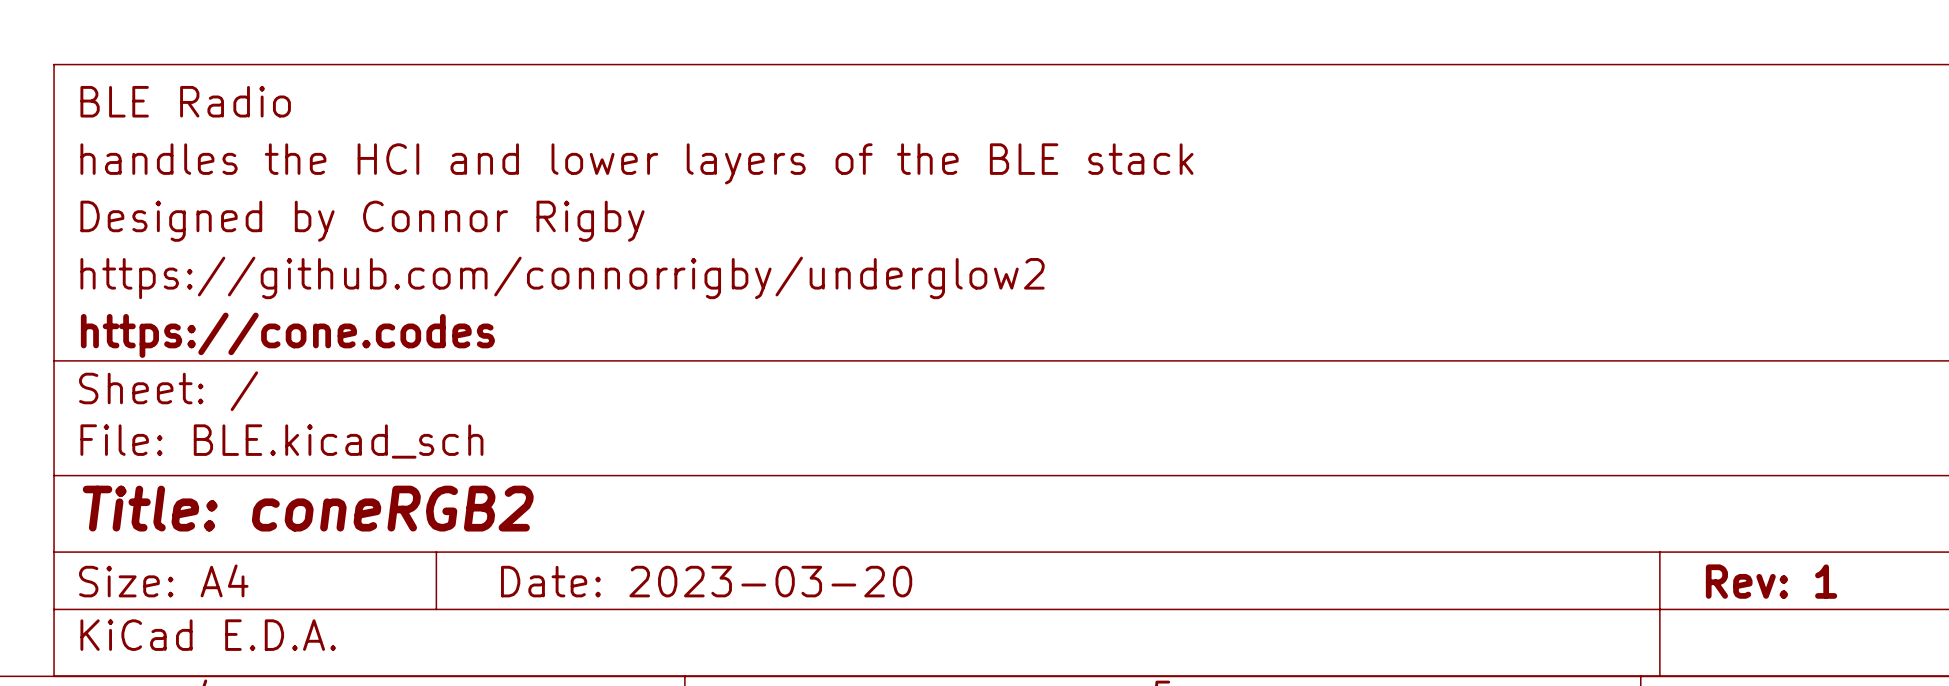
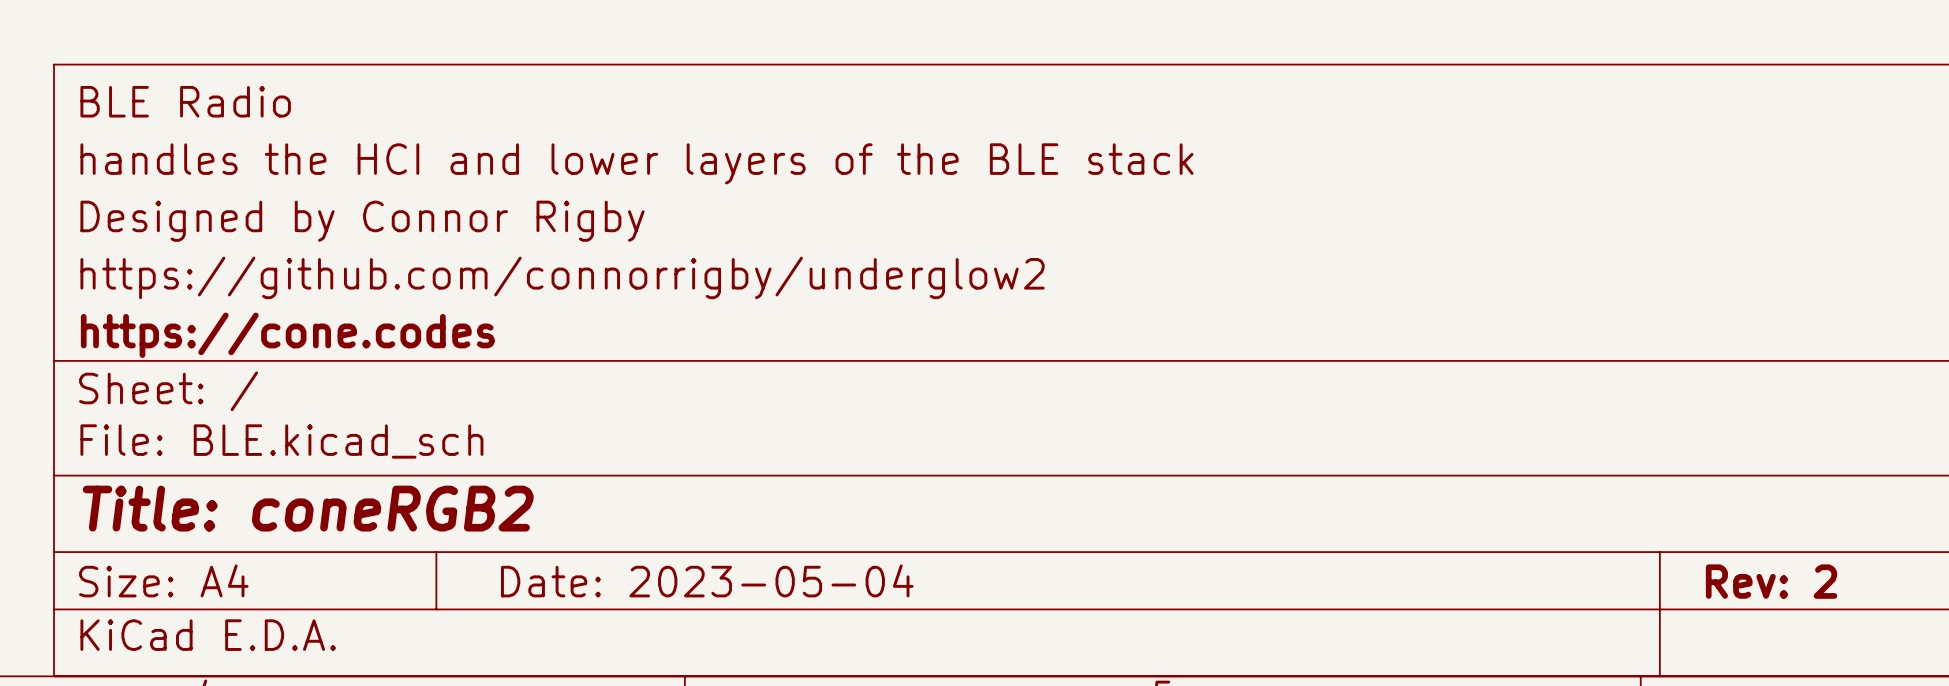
title block: Date: 2023-03-20 (706, 581) -> Date: 2023-05-04 (707, 580)
title block: Rev: 1 (1771, 581) -> Rev: 2 (1771, 581)

